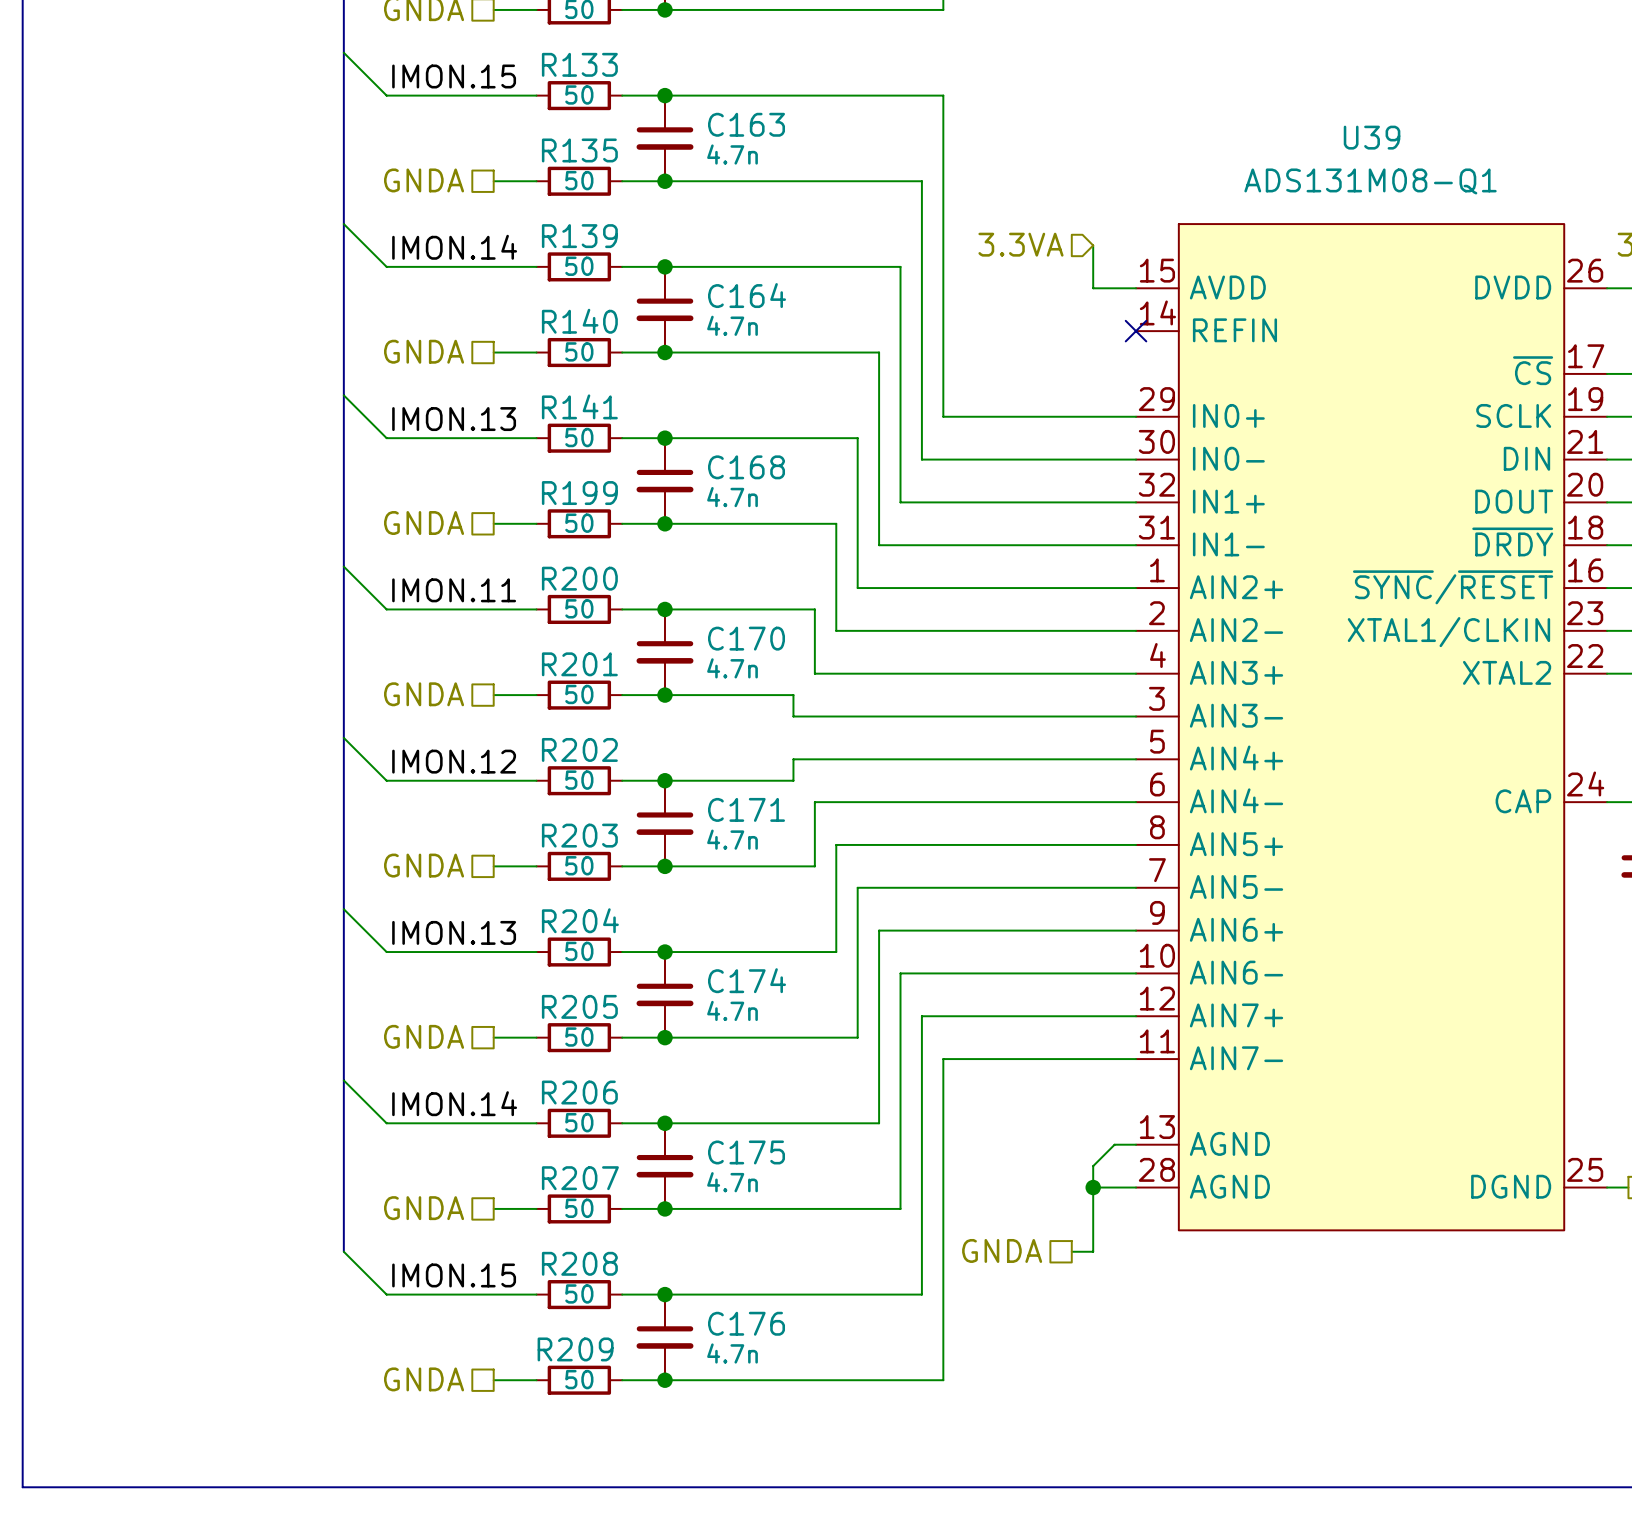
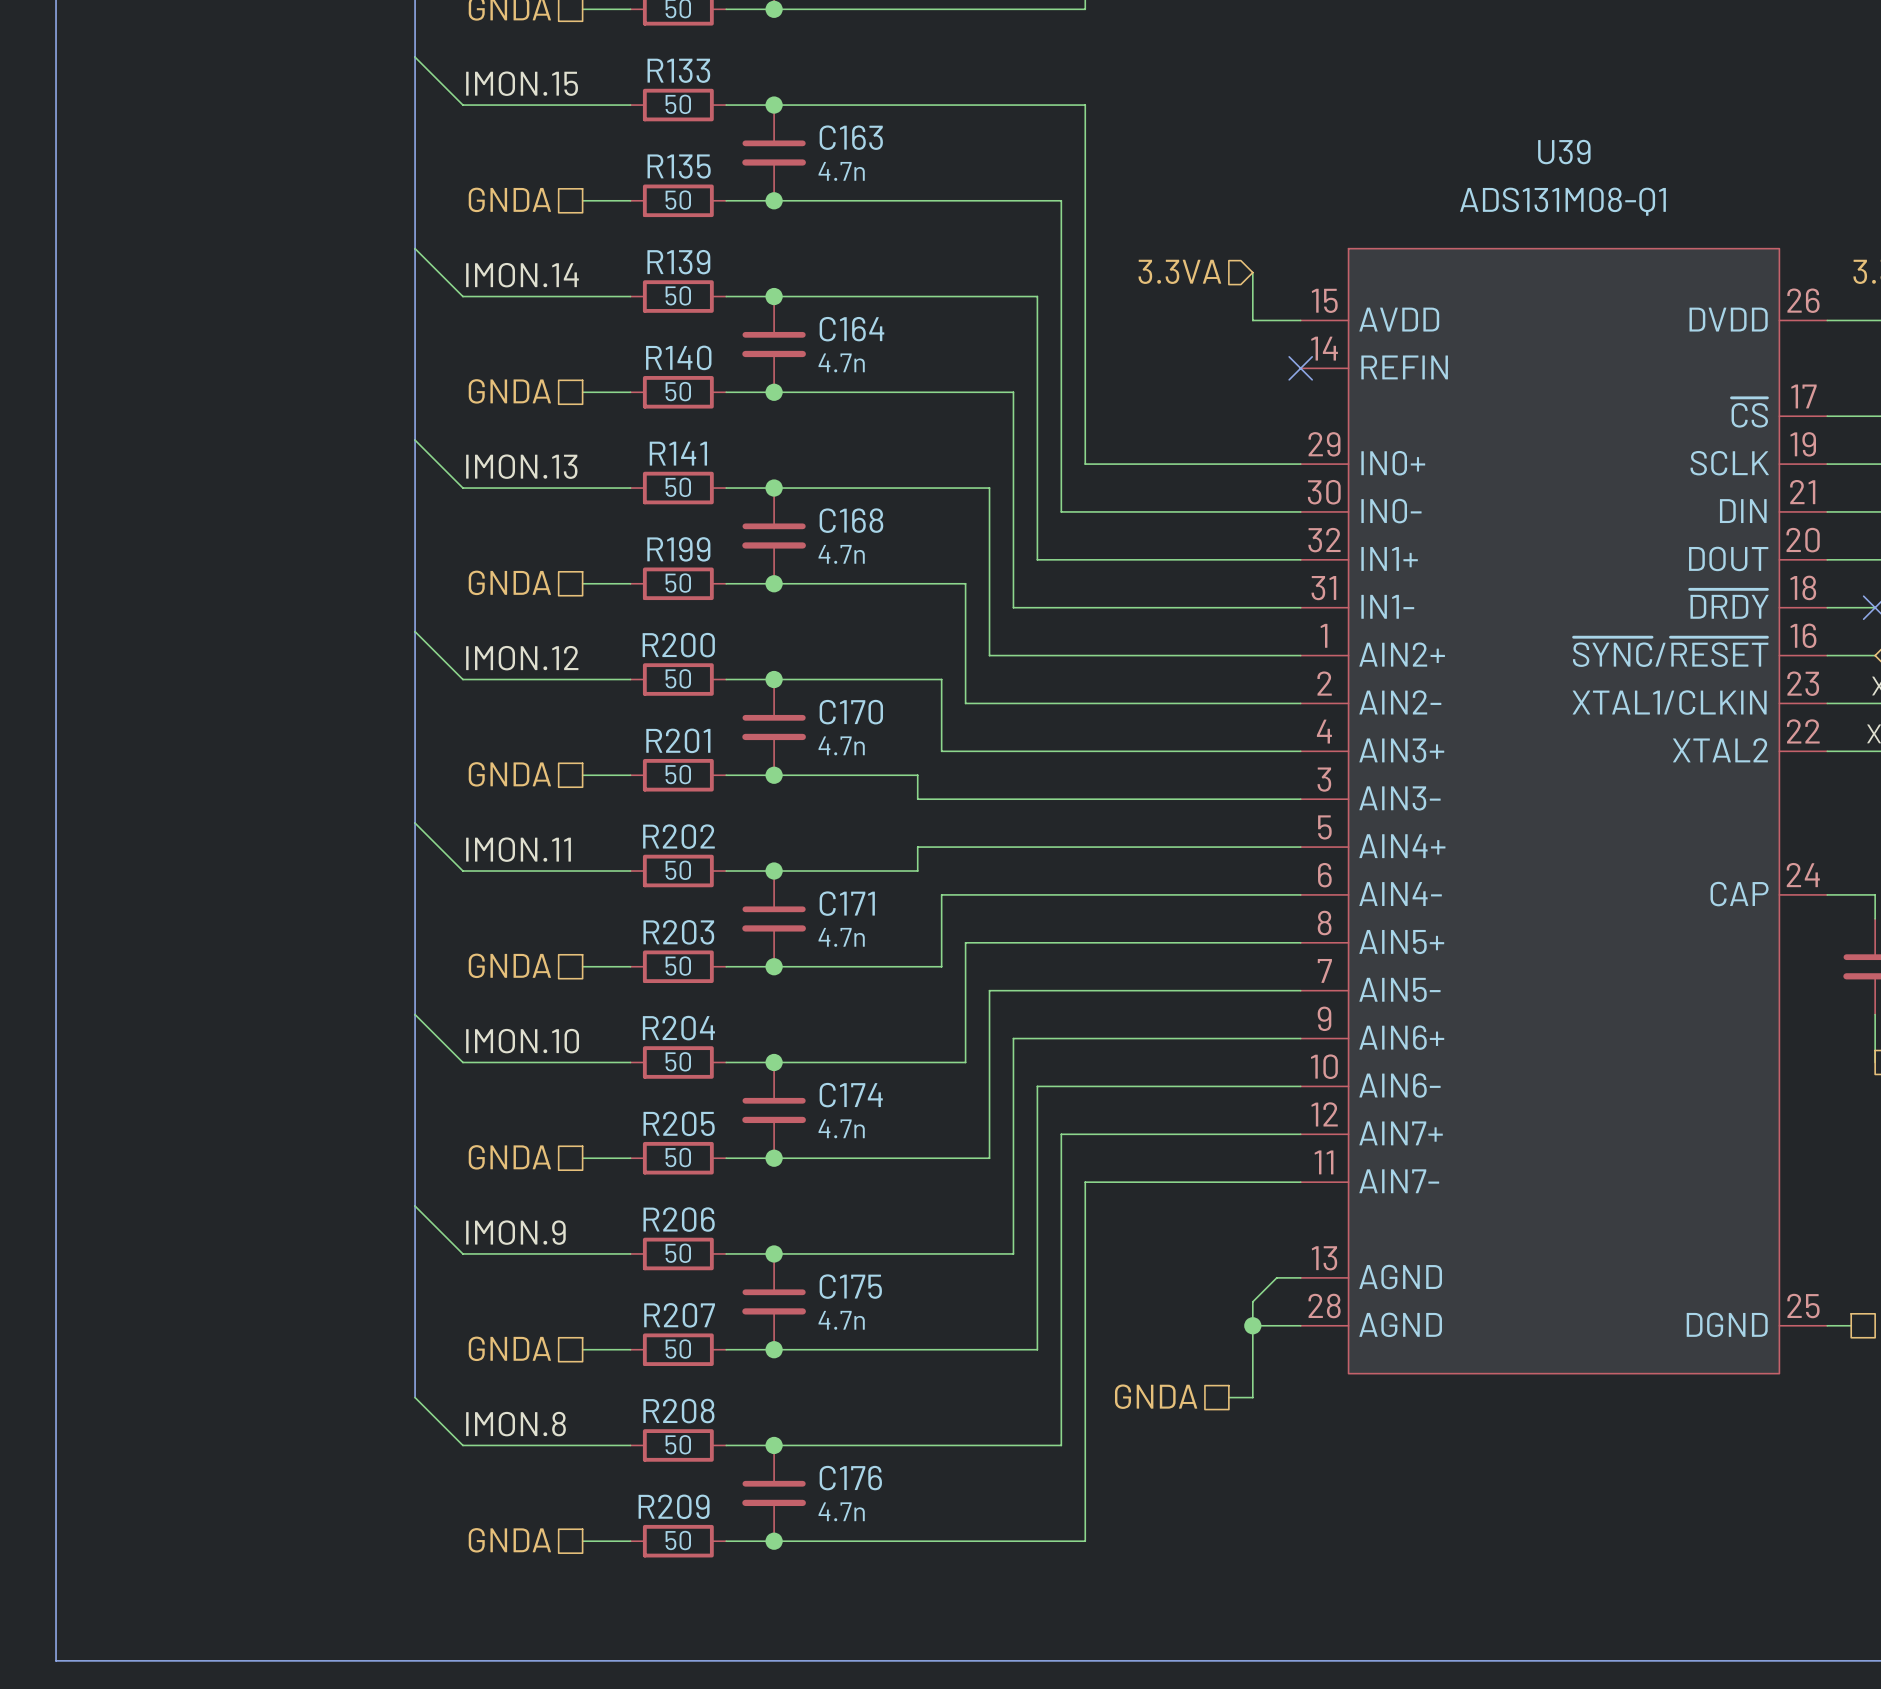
label: IMON.11 (454, 590) -> IMON.12 (522, 658)
label: IMON.12 (454, 761) -> IMON.11 (518, 849)
label: IMON.13 (454, 932) -> IMON.10 (522, 1041)
label: IMON.14 (454, 1103) -> IMON.9 (515, 1232)
label: IMON.15 (454, 1275) -> IMON.8 (516, 1424)

